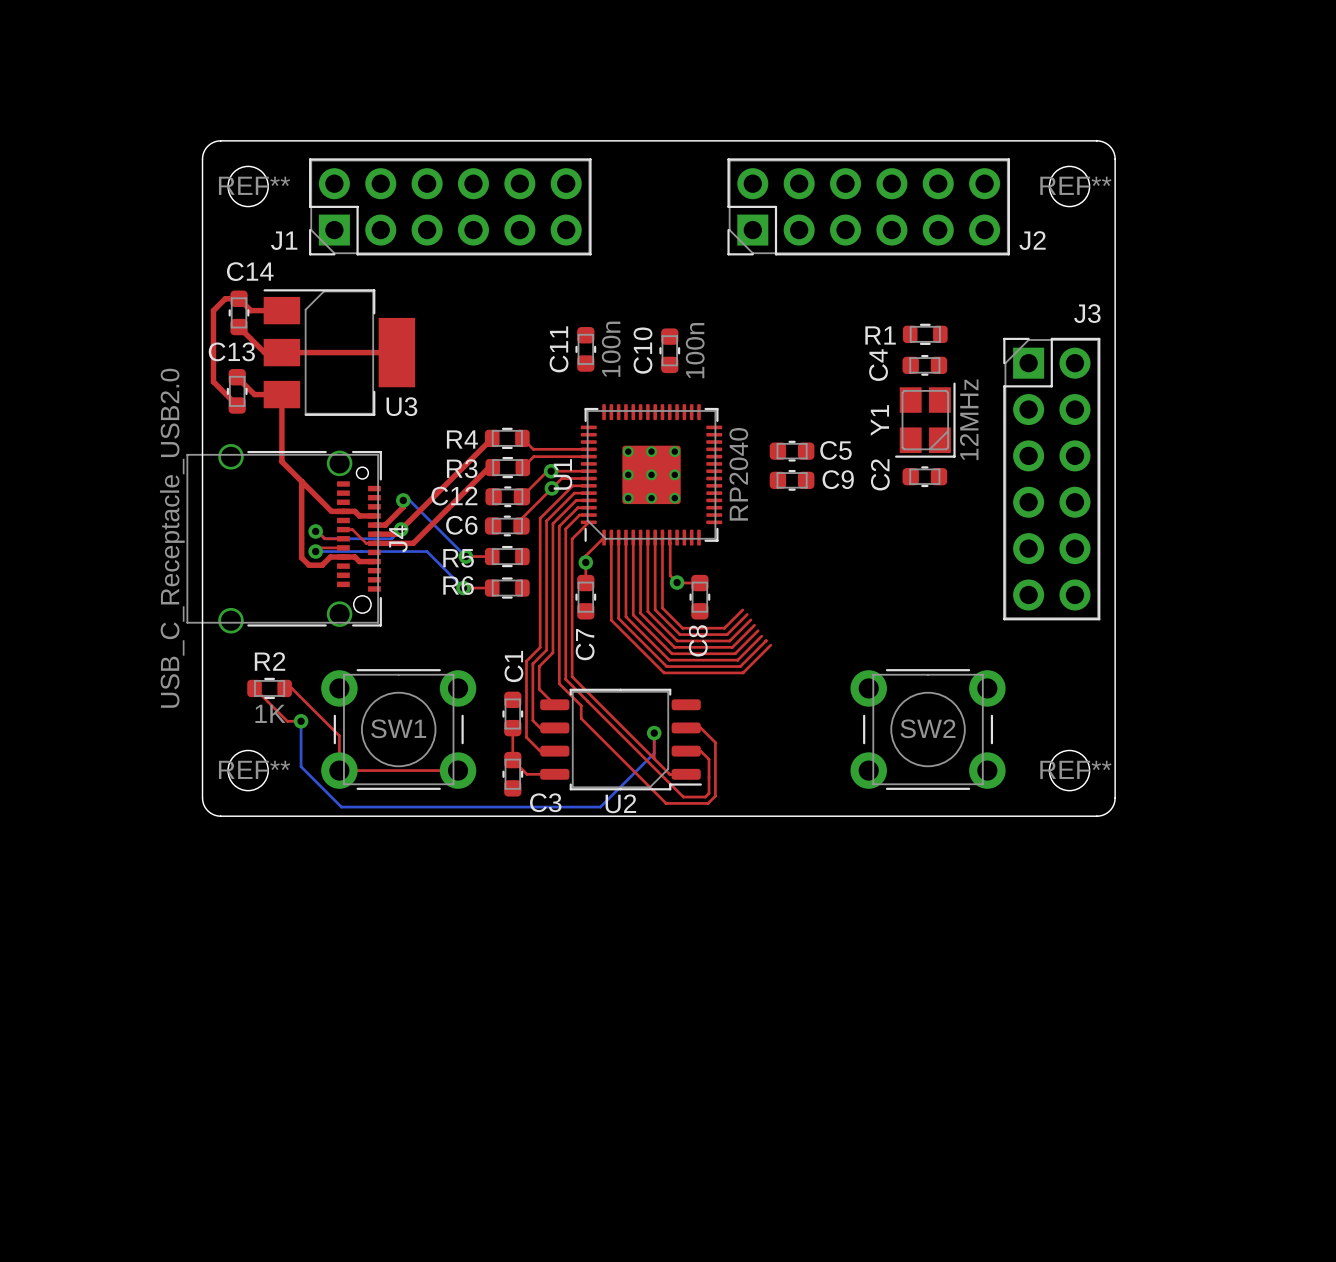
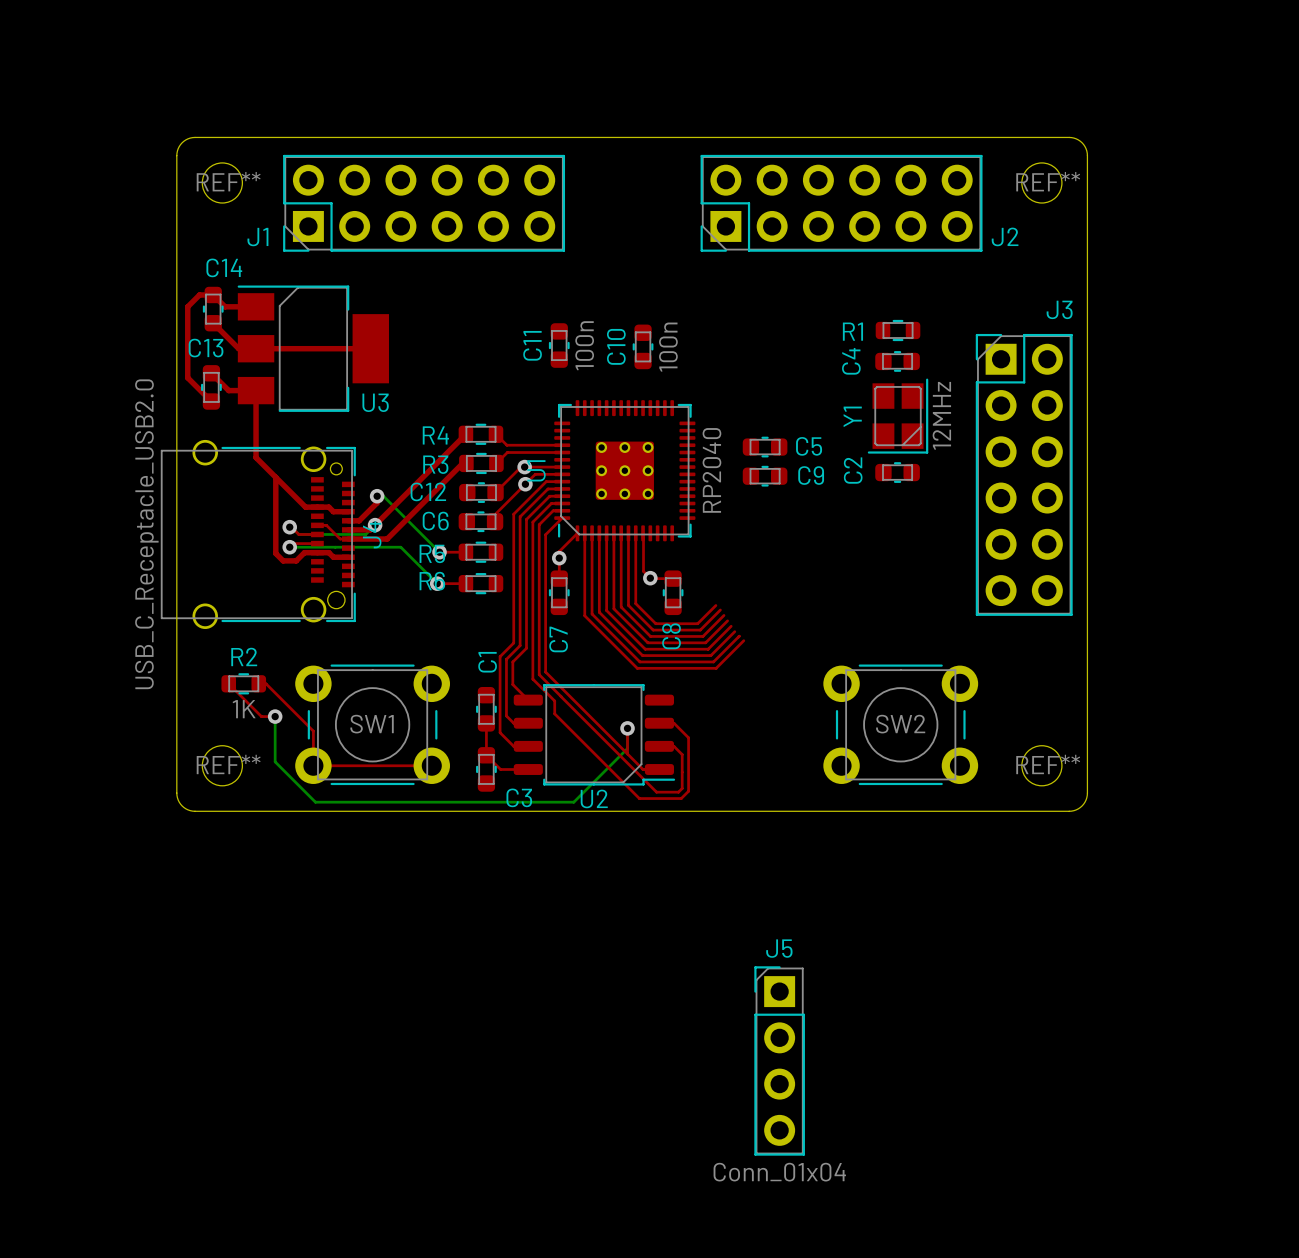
J5: none -> Conn_01x04 (779, 1060)

